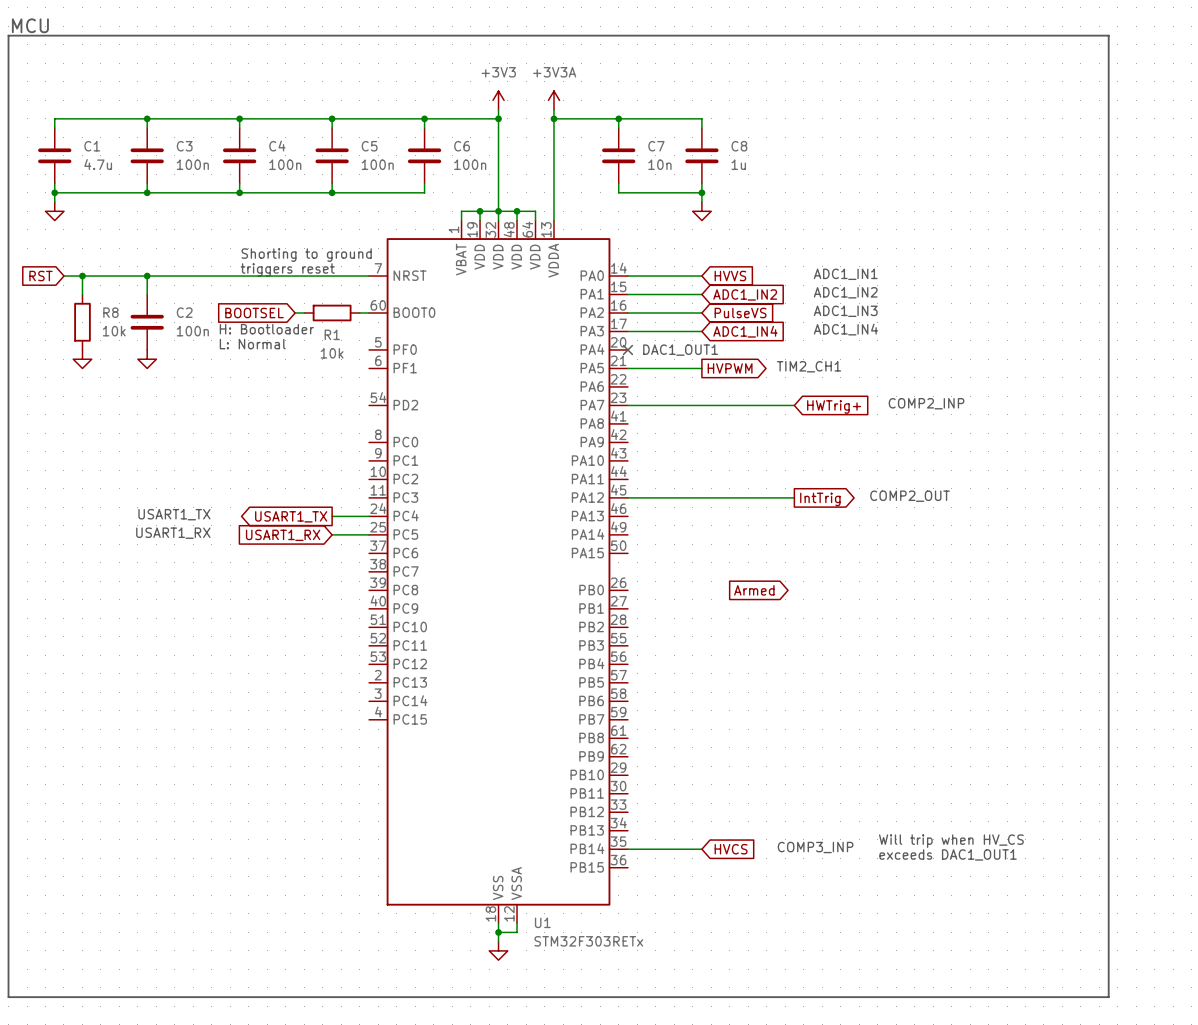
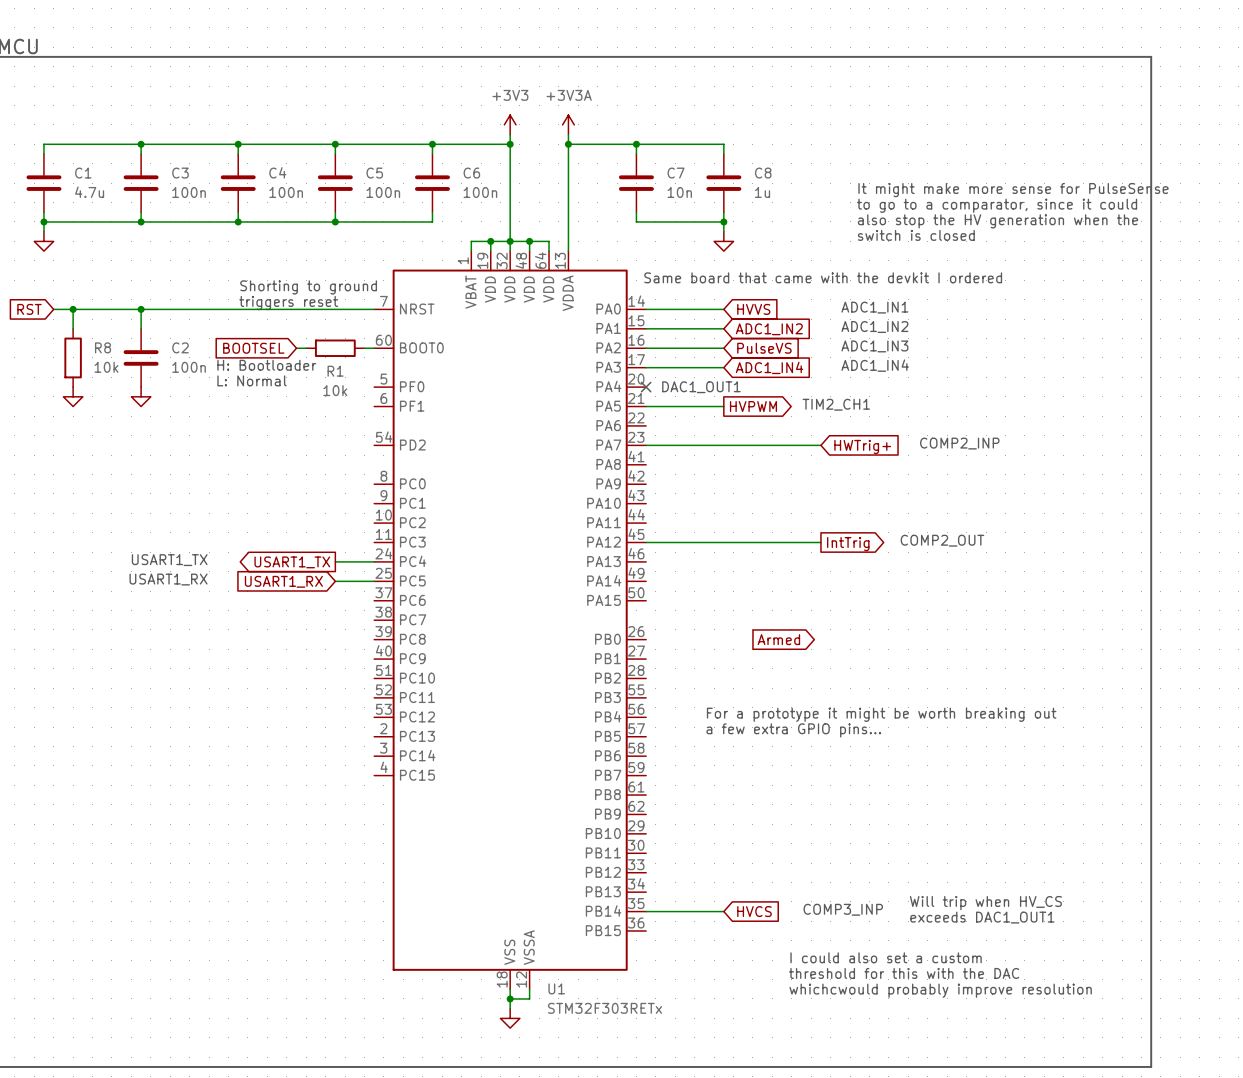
text: none -> It might make more sense for PulseSense (1013, 190)
text: none -> to go to a comparator, since it could (997, 205)
text: none -> also stop the HV generation when the (997, 221)
text: none -> switch is closed (916, 235)
text: none -> Same board that came with the devkit I ordered (823, 277)
text: none -> For a prototype it might be worth breaking out (881, 714)
text: none -> a few extra GPIO pins... (793, 730)
text: none -> I could also set a custom (886, 957)
text: none -> threshold for this with the DAC (904, 973)
text: none -> whichcwould probably improve resolution (940, 990)

